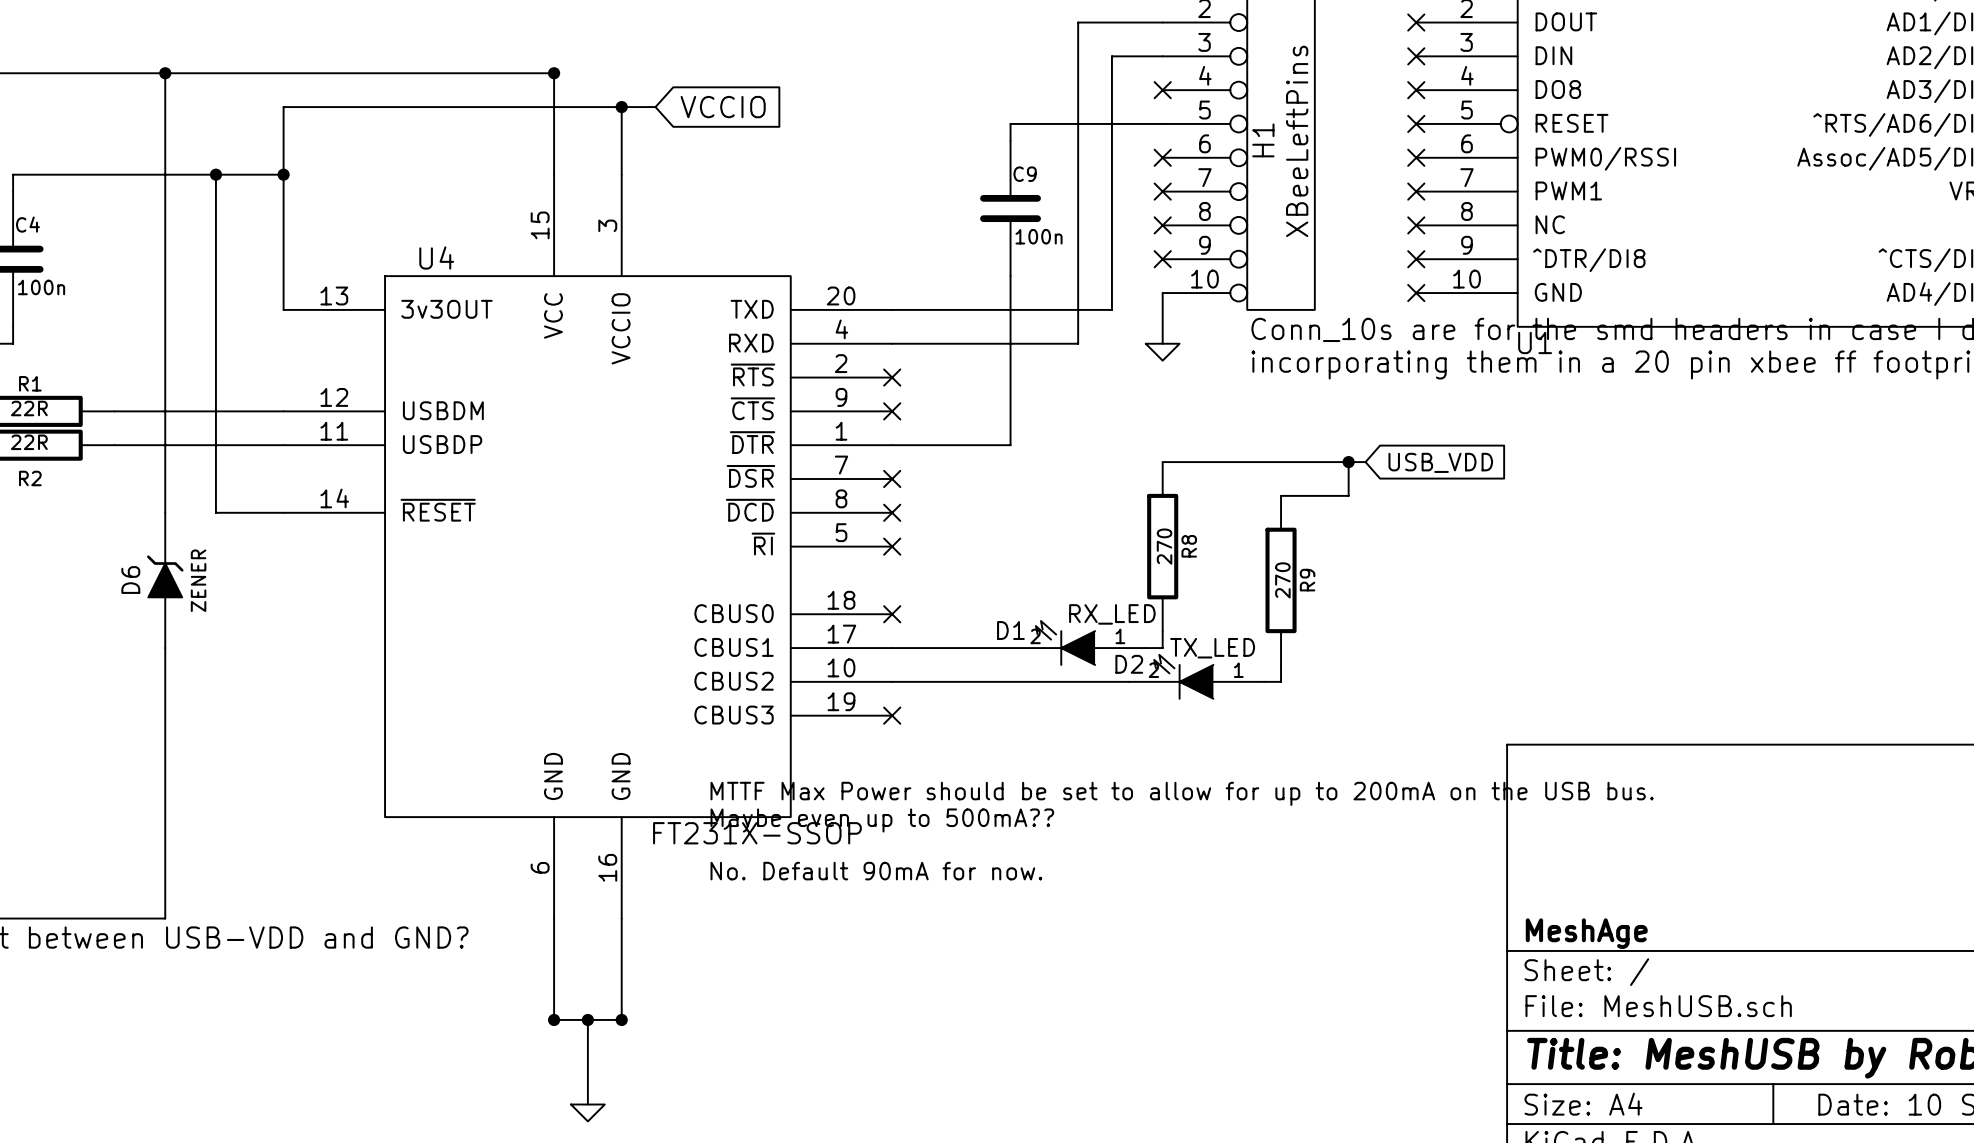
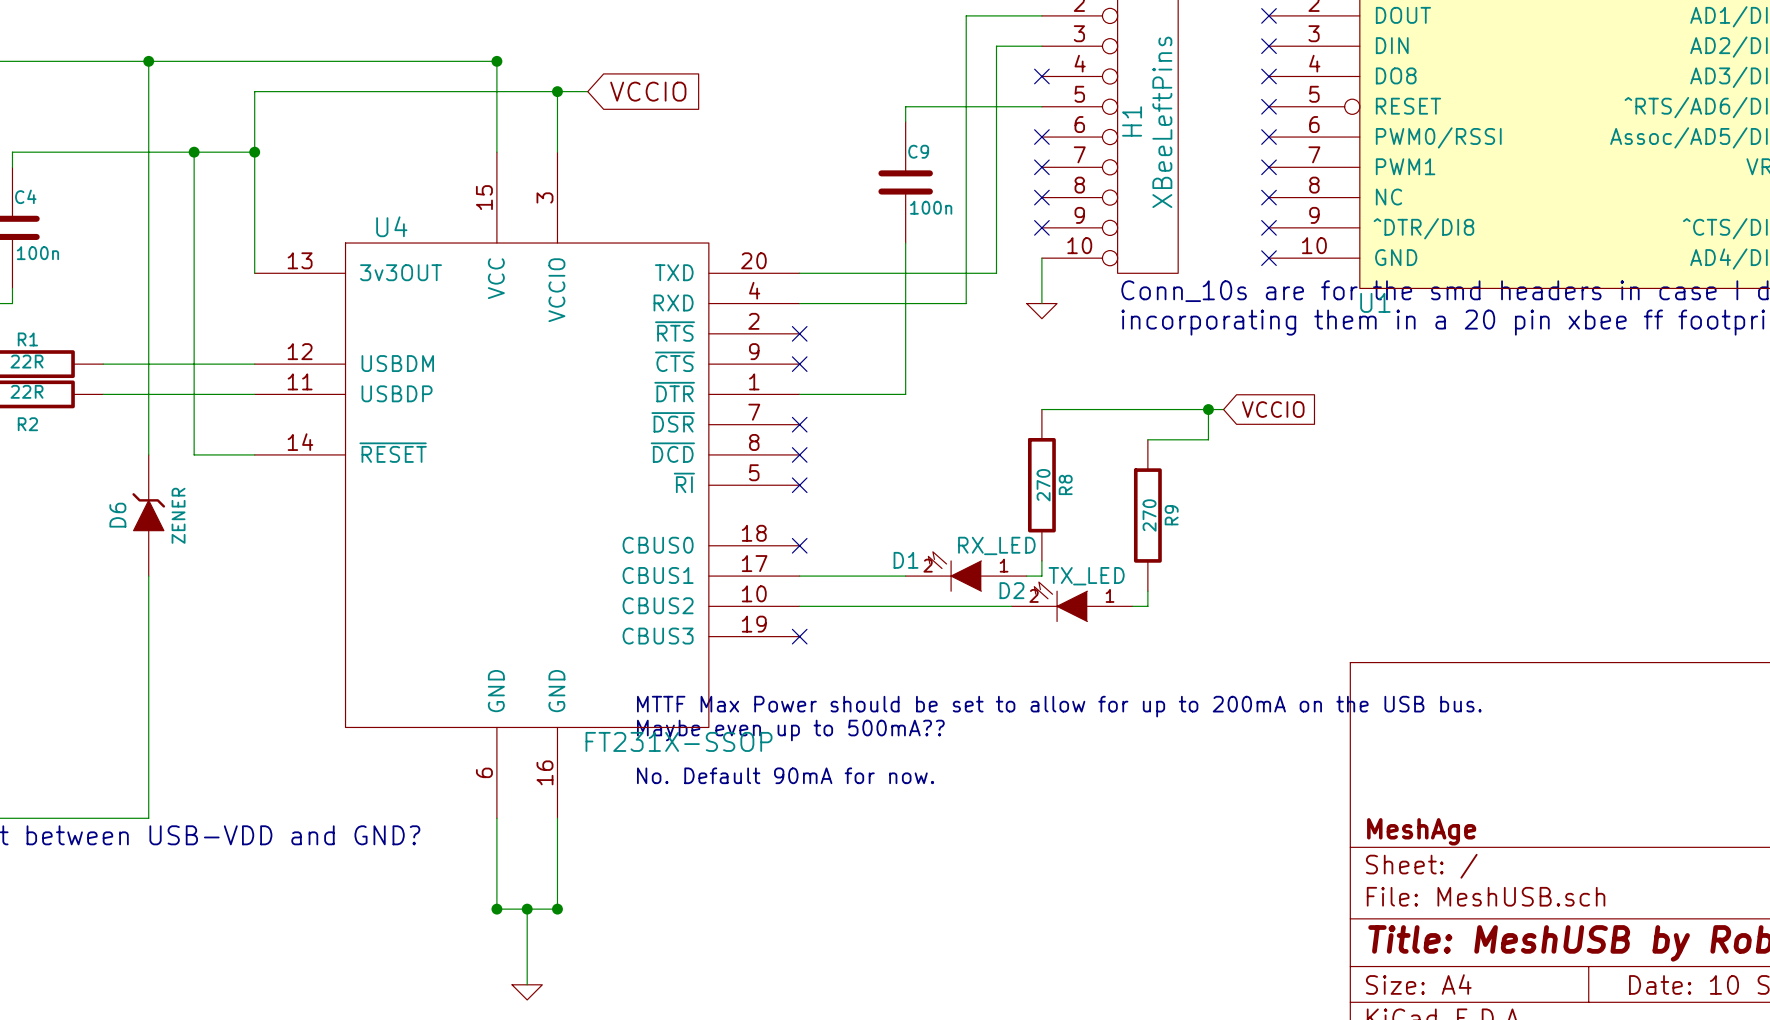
global label: USB_VDD (1440, 462) -> VCCIO (1273, 409)

